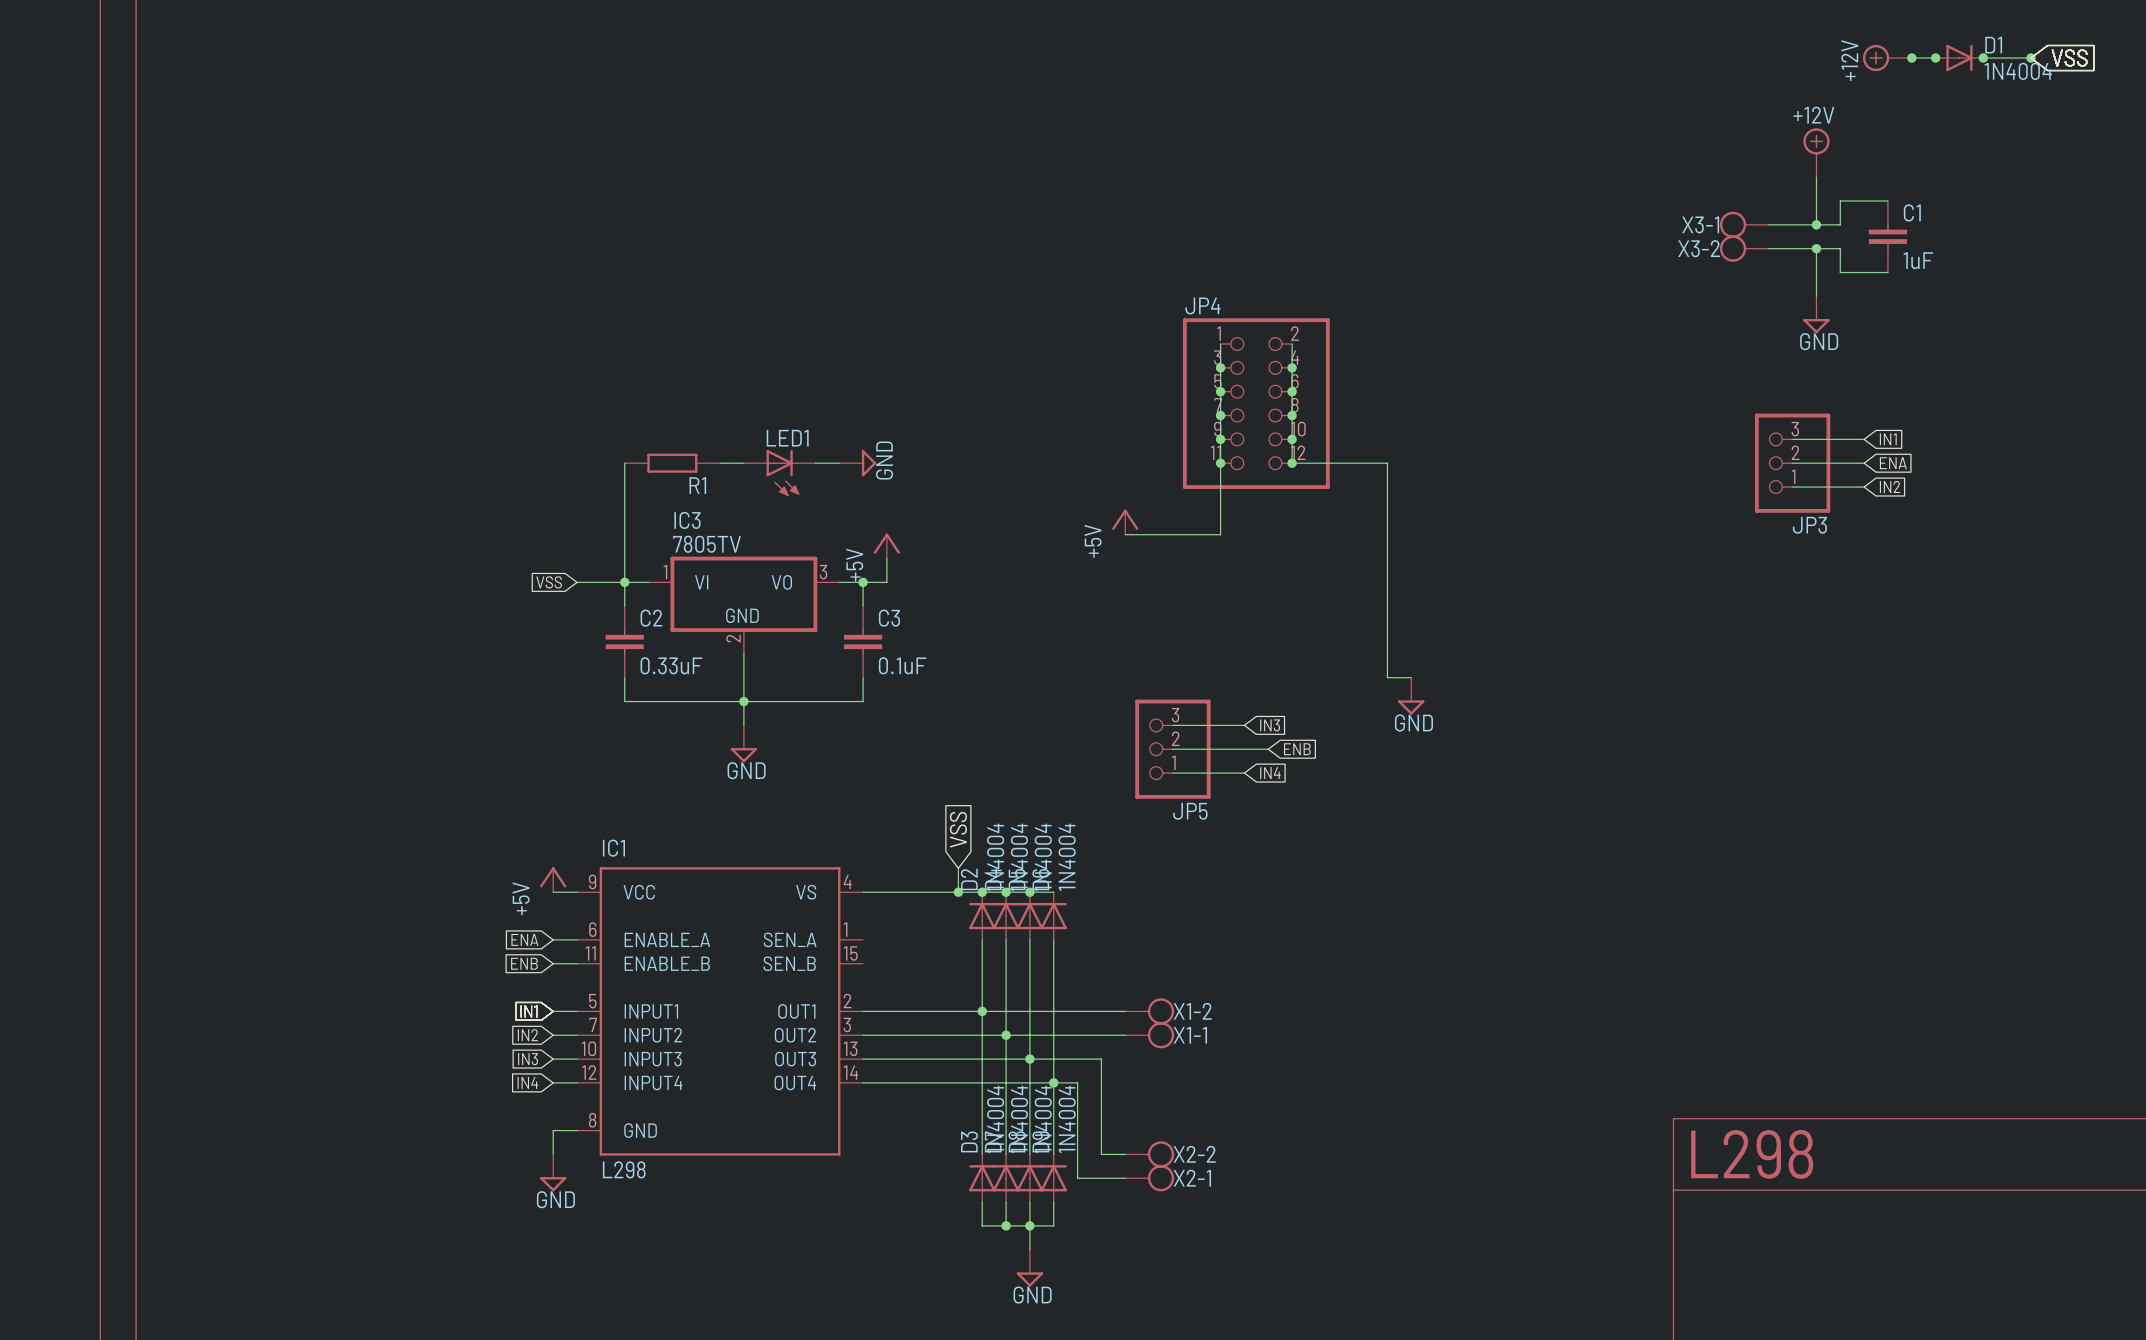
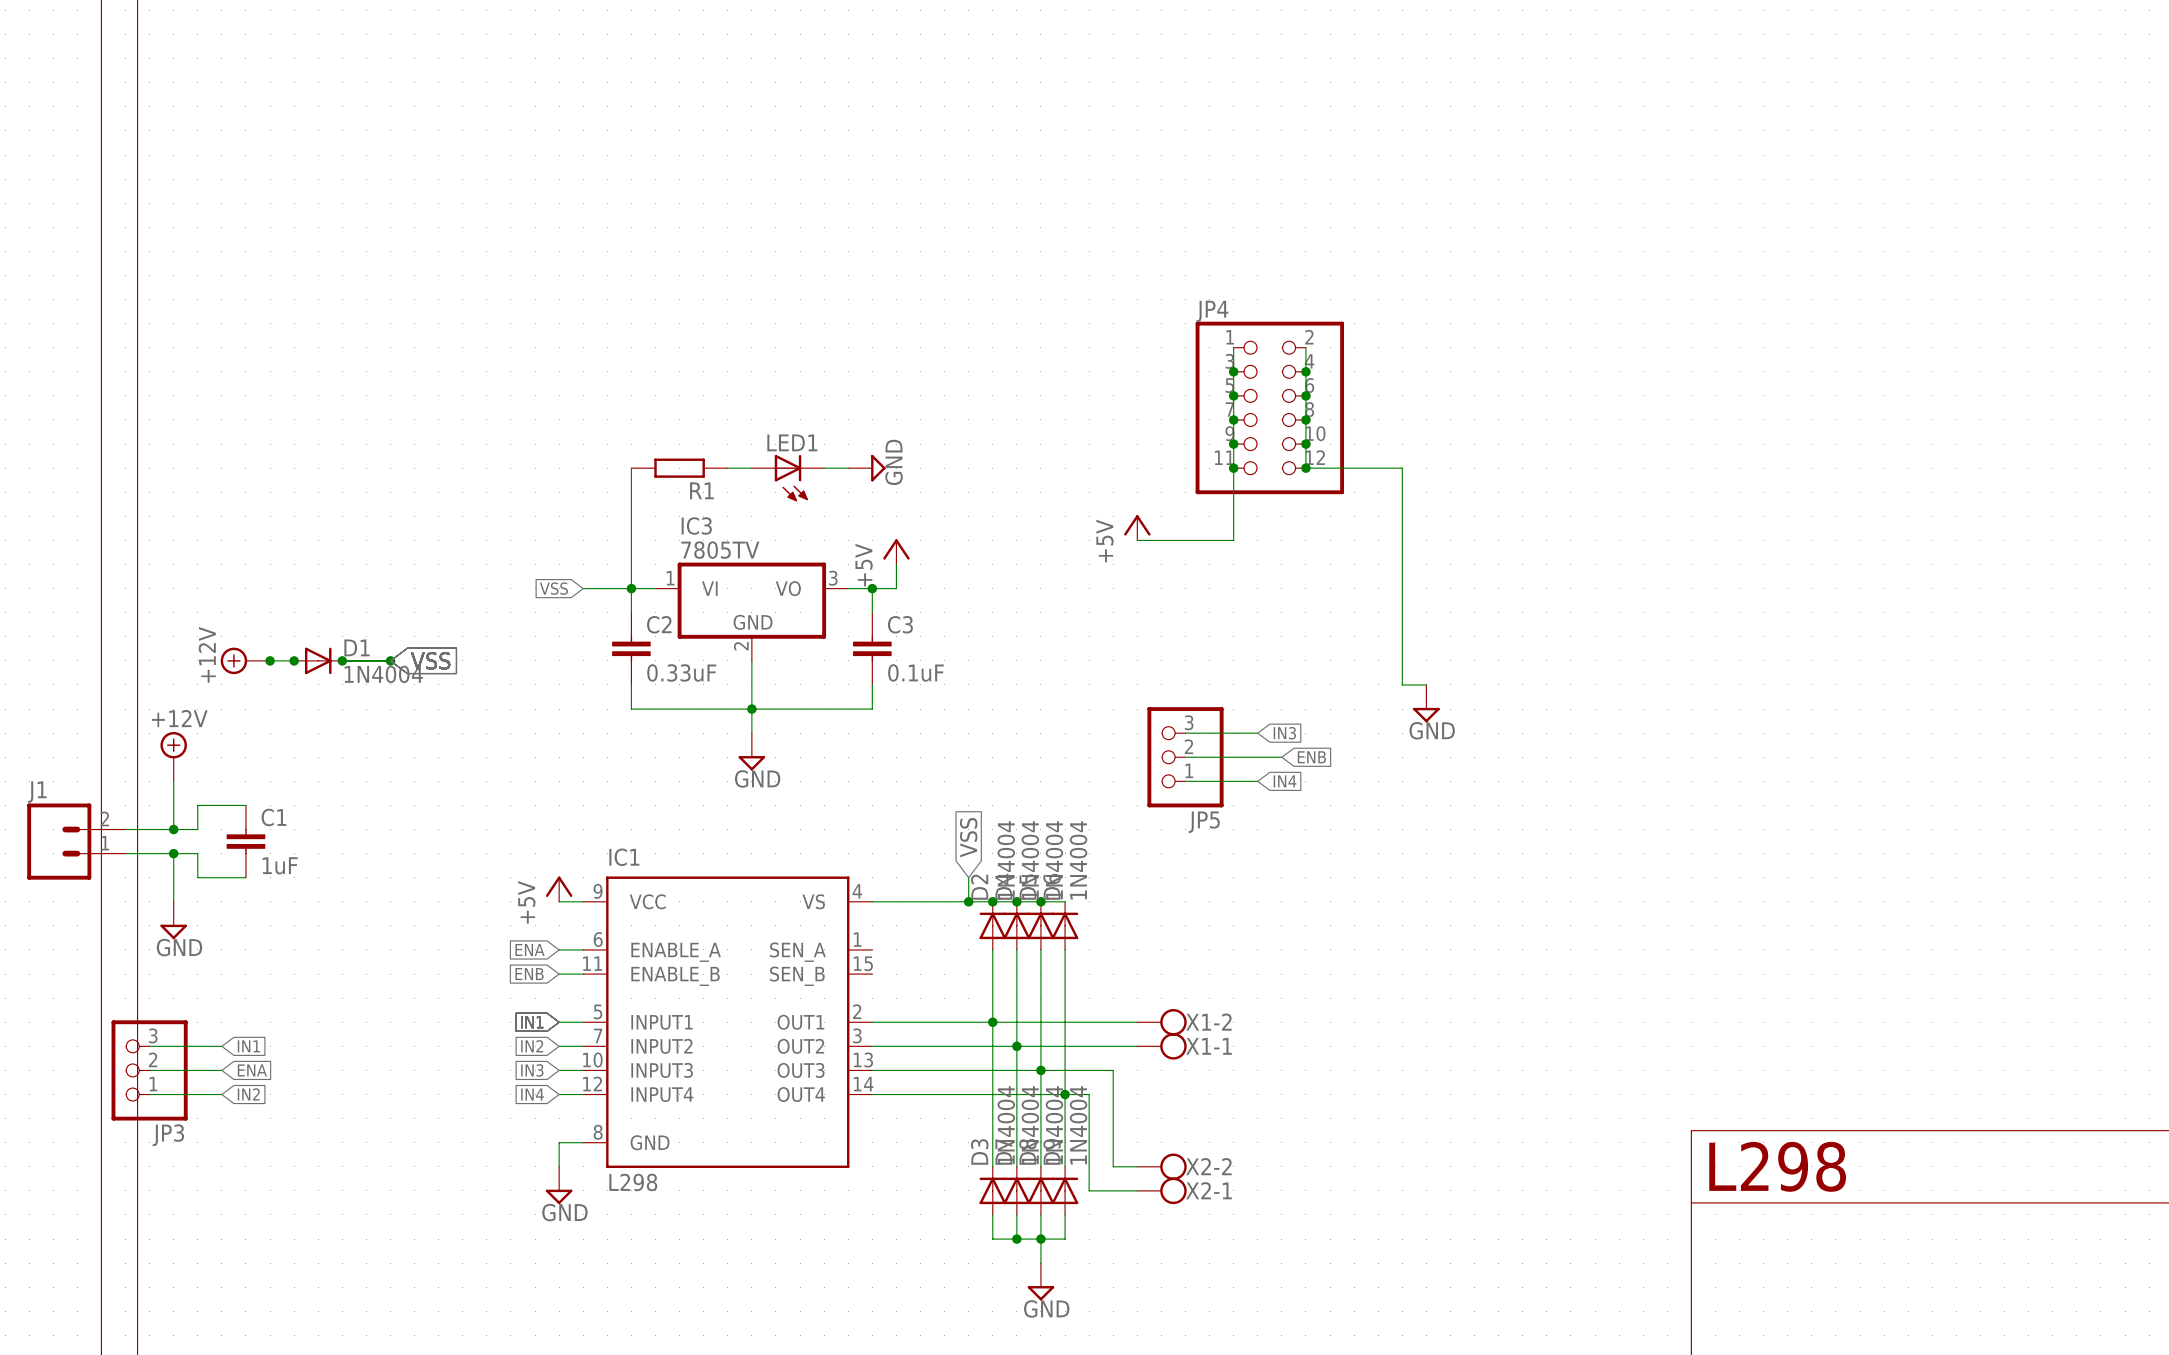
power symbol: +12V (1887, 58) -> none
wire: (1911, 58) (1935, 58) -> none
junction: (1911, 58) -> none
junction: (1935, 58) -> none
D1 position: (1959, 58) -> (318, 660)
wire: (1983, 58) (2030, 58) -> none
junction: (1983, 58) -> none
junction: (2030, 58) -> none
global label: VSS (2069, 58) -> none
power symbol: +12V (1816, 152) -> none
wire: (1816, 177) (1816, 224) -> none
wire: (1887, 201) (1840, 201) (1840, 224) (1768, 224) -> none
X3-1: (1744, 224) -> none
junction: (1816, 224) -> none
C1 position: (1887, 236) -> (245, 841)
X3-2: (1744, 248) -> none
wire: (1768, 248) (1840, 248) (1840, 272) (1887, 272) -> none
wire: (1816, 248) (1816, 296) -> none
junction: (1816, 248) -> none
power symbol: GND (1816, 314) -> none
wire: (1792, 439) (1864, 439) -> none
global label: IN1 (1888, 439) -> none
wire: (1792, 463) (1864, 463) -> none
JP3 position: (1792, 463) -> (149, 1070)
global label: ENA (1893, 463) -> none
global label: IN2 (1889, 486) -> none
wire: (1792, 487) (1864, 487) -> none
power symbol: none -> +12V (245, 660)
wire: none -> (270, 660) (294, 660)
junction: none -> (270, 660)
junction: none -> (294, 660)
wire: none -> (342, 660) (390, 660)
junction: none -> (342, 660)
junction: none -> (390, 660)
global label: none -> VSS (430, 660)
power symbol: none -> +12V (173, 756)
wire: none -> (173, 781) (173, 829)
wire: none -> (245, 805) (197, 805) (197, 829) (125, 829)
junction: none -> (173, 829)
J1: none -> (76, 841)
wire: none -> (125, 853) (197, 853) (197, 877) (245, 877)
wire: none -> (173, 853) (173, 901)
junction: none -> (173, 853)
power symbol: none -> GND (173, 920)
wire: none -> (149, 1046) (221, 1046)
global label: none -> IN1 (248, 1046)
wire: none -> (149, 1070) (221, 1070)
global label: none -> ENA (252, 1070)
wire: none -> (149, 1094) (221, 1094)
global label: none -> IN2 (248, 1094)

